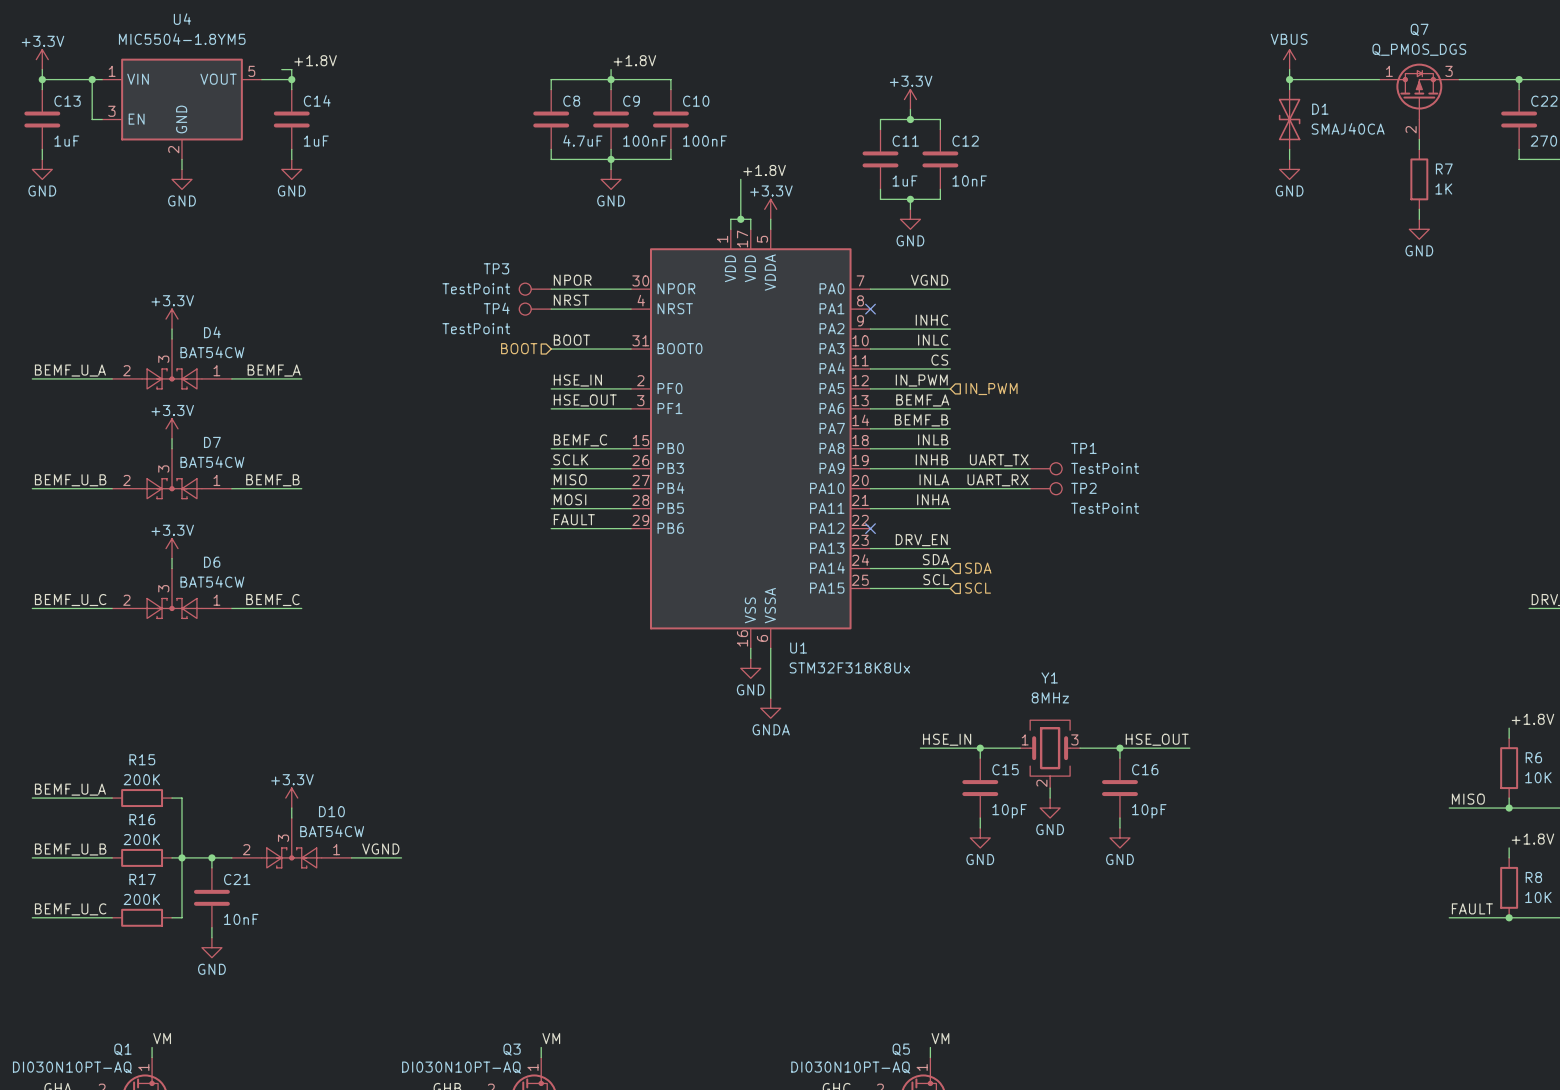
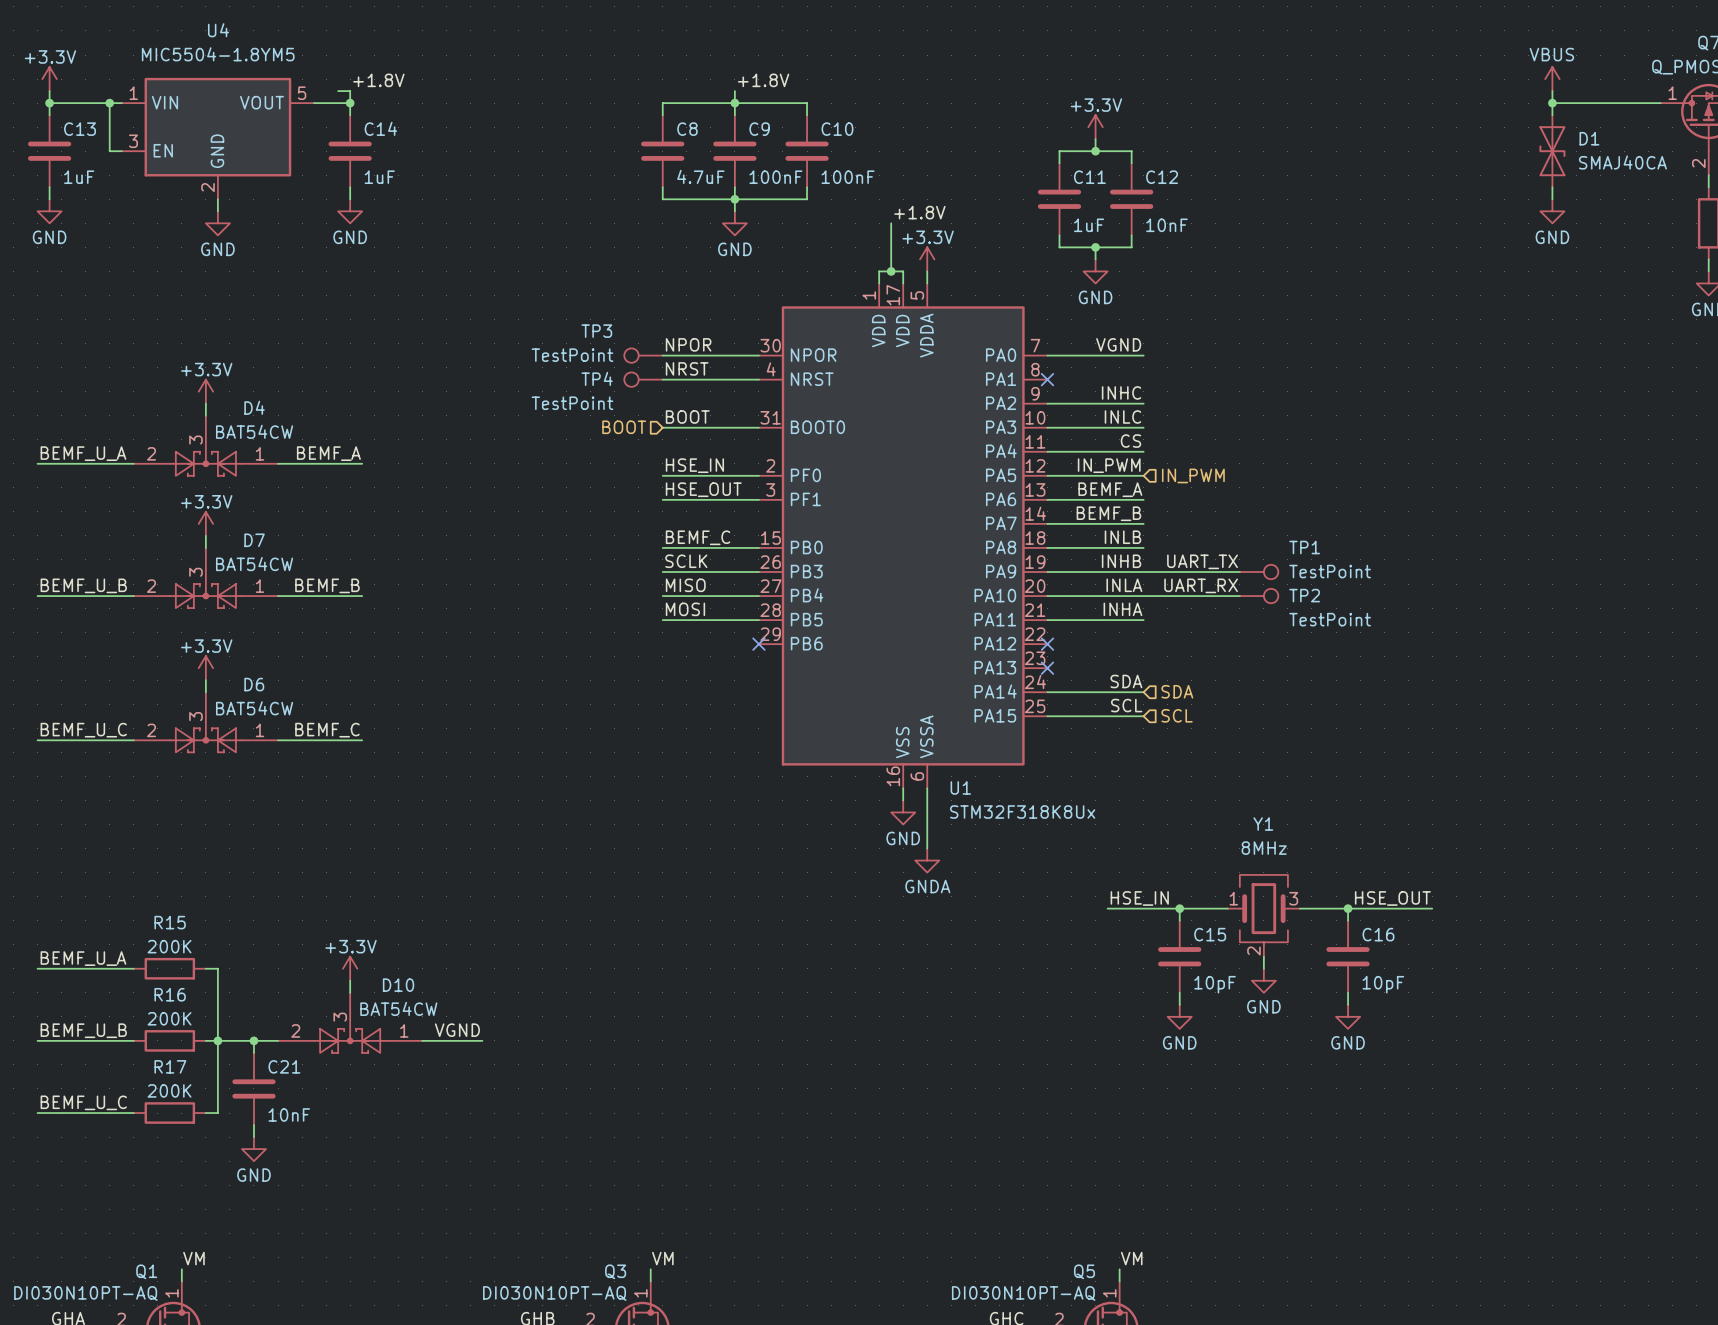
label: FAULT (574, 519) -> none
wire: (551, 528) (631, 528) -> none
no-connect mark: none -> (758, 644)
label: DRV_EN (921, 540) -> none
wire: (870, 548) (950, 548) -> none
no-connect mark: none -> (1047, 668)

